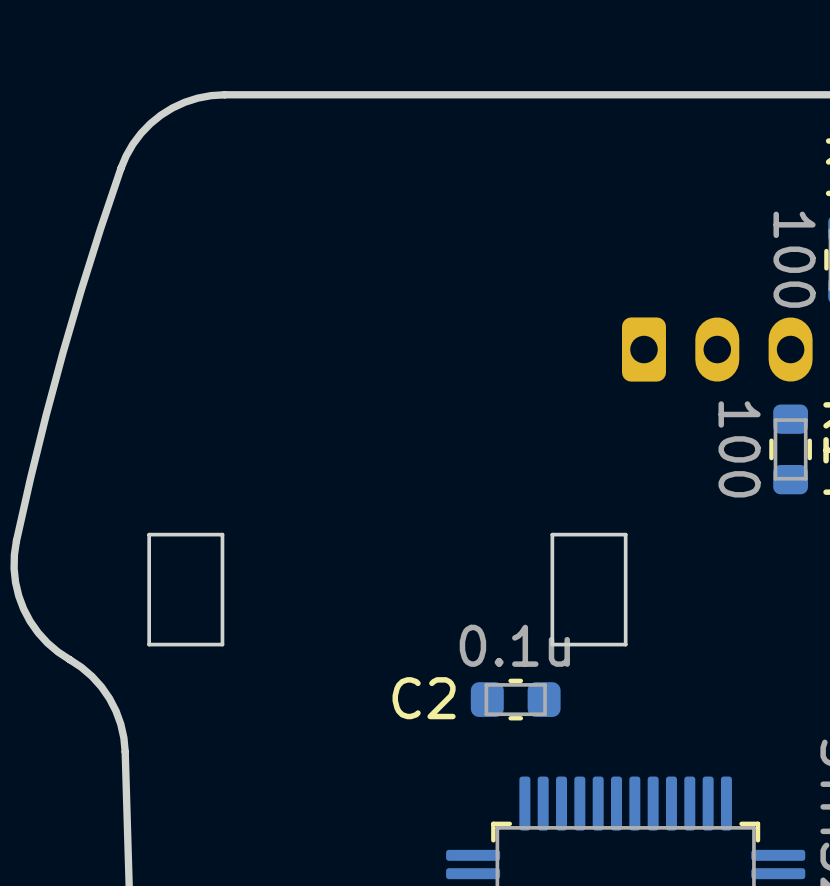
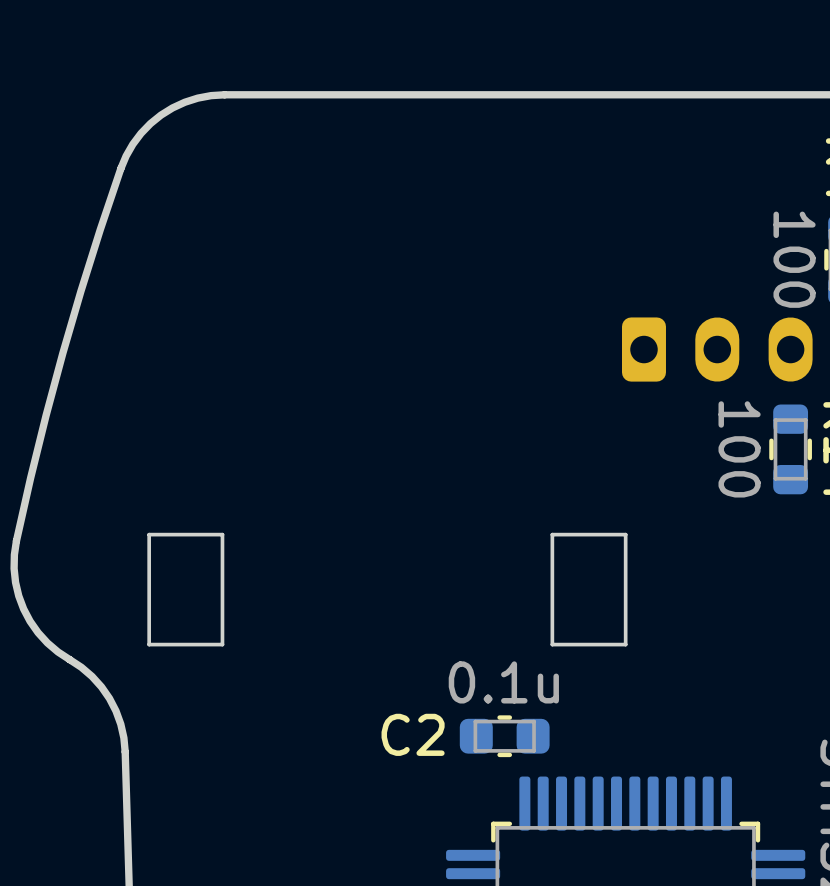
C2 position: (515, 699) -> (504, 736)

